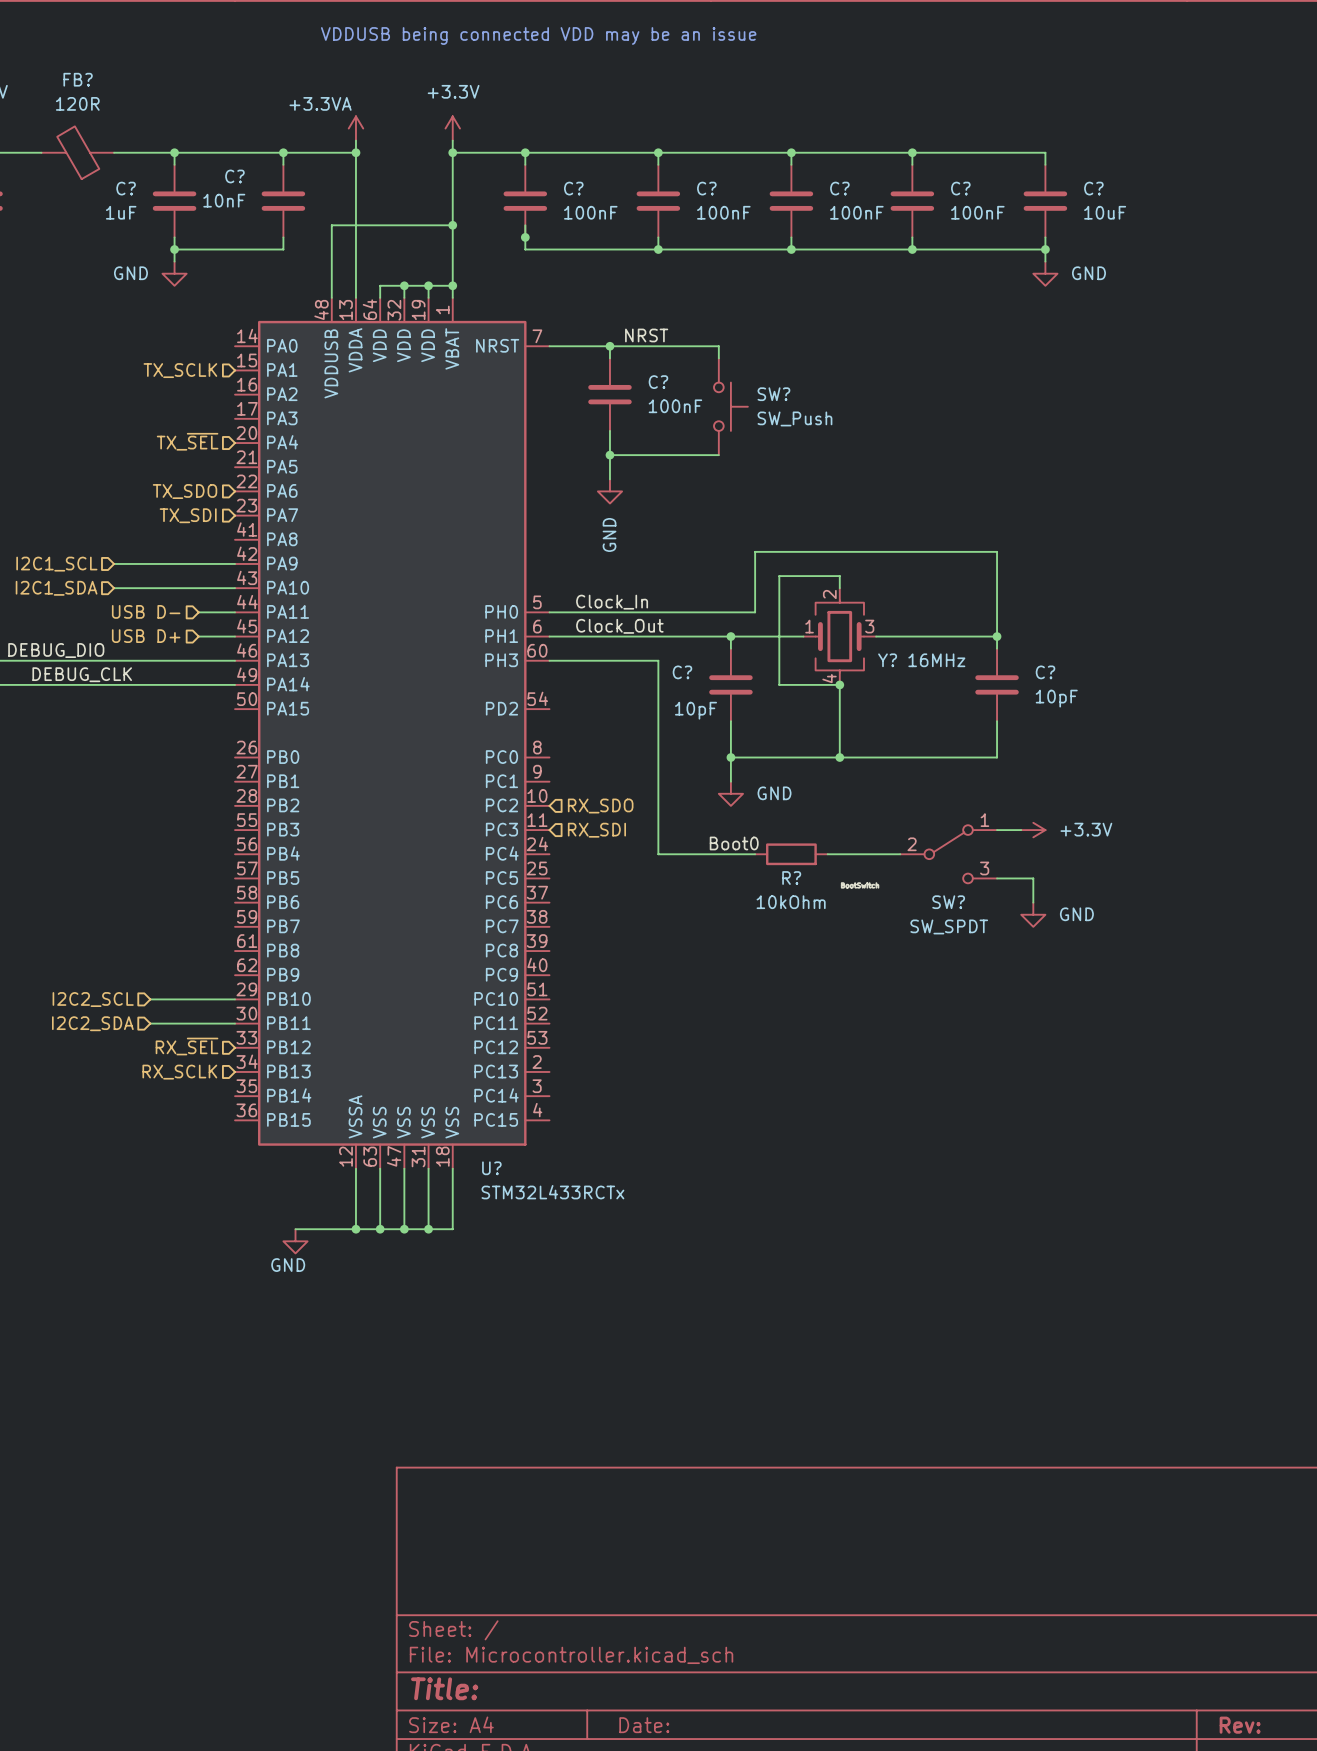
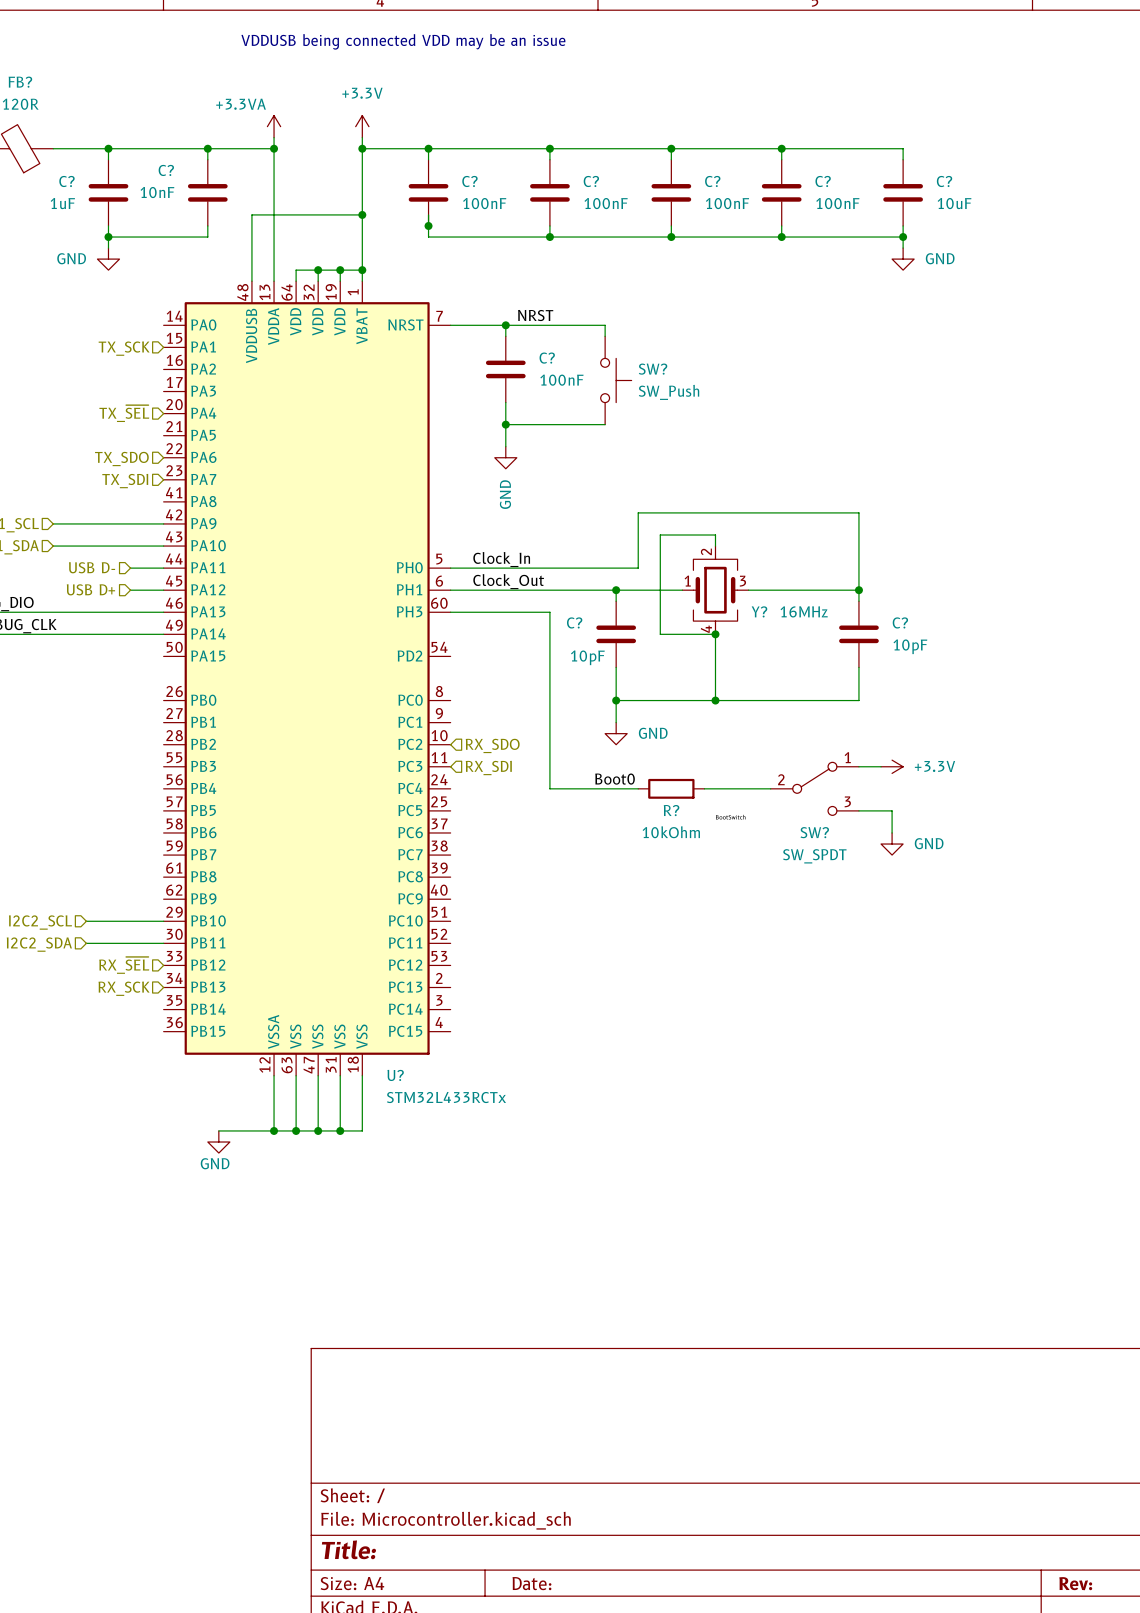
hierarchical label: TX_SCLK (180, 370) -> TX_SCK (124, 348)
hierarchical label: RX_SCLK (179, 1072) -> RX_SCK (124, 988)

